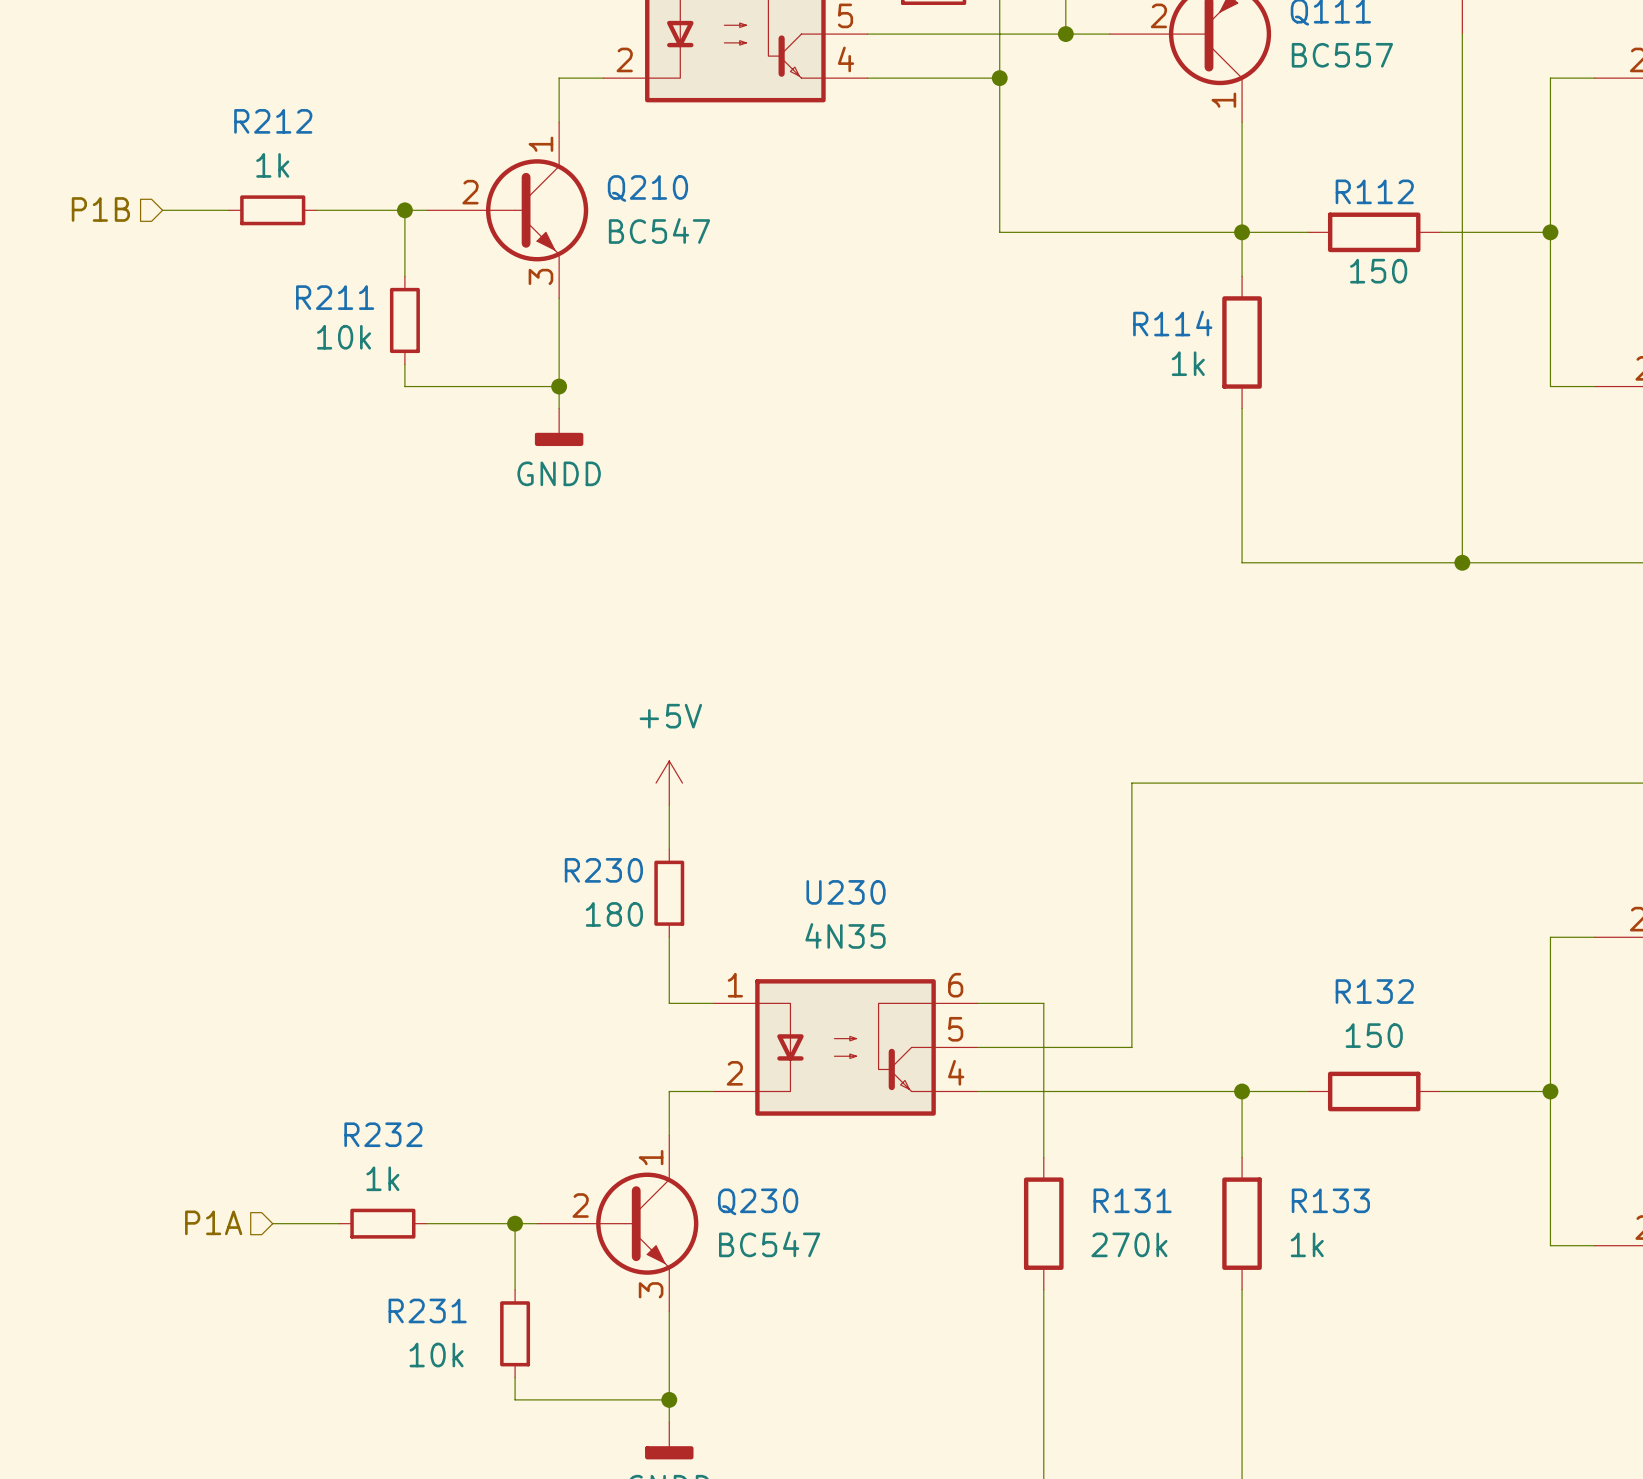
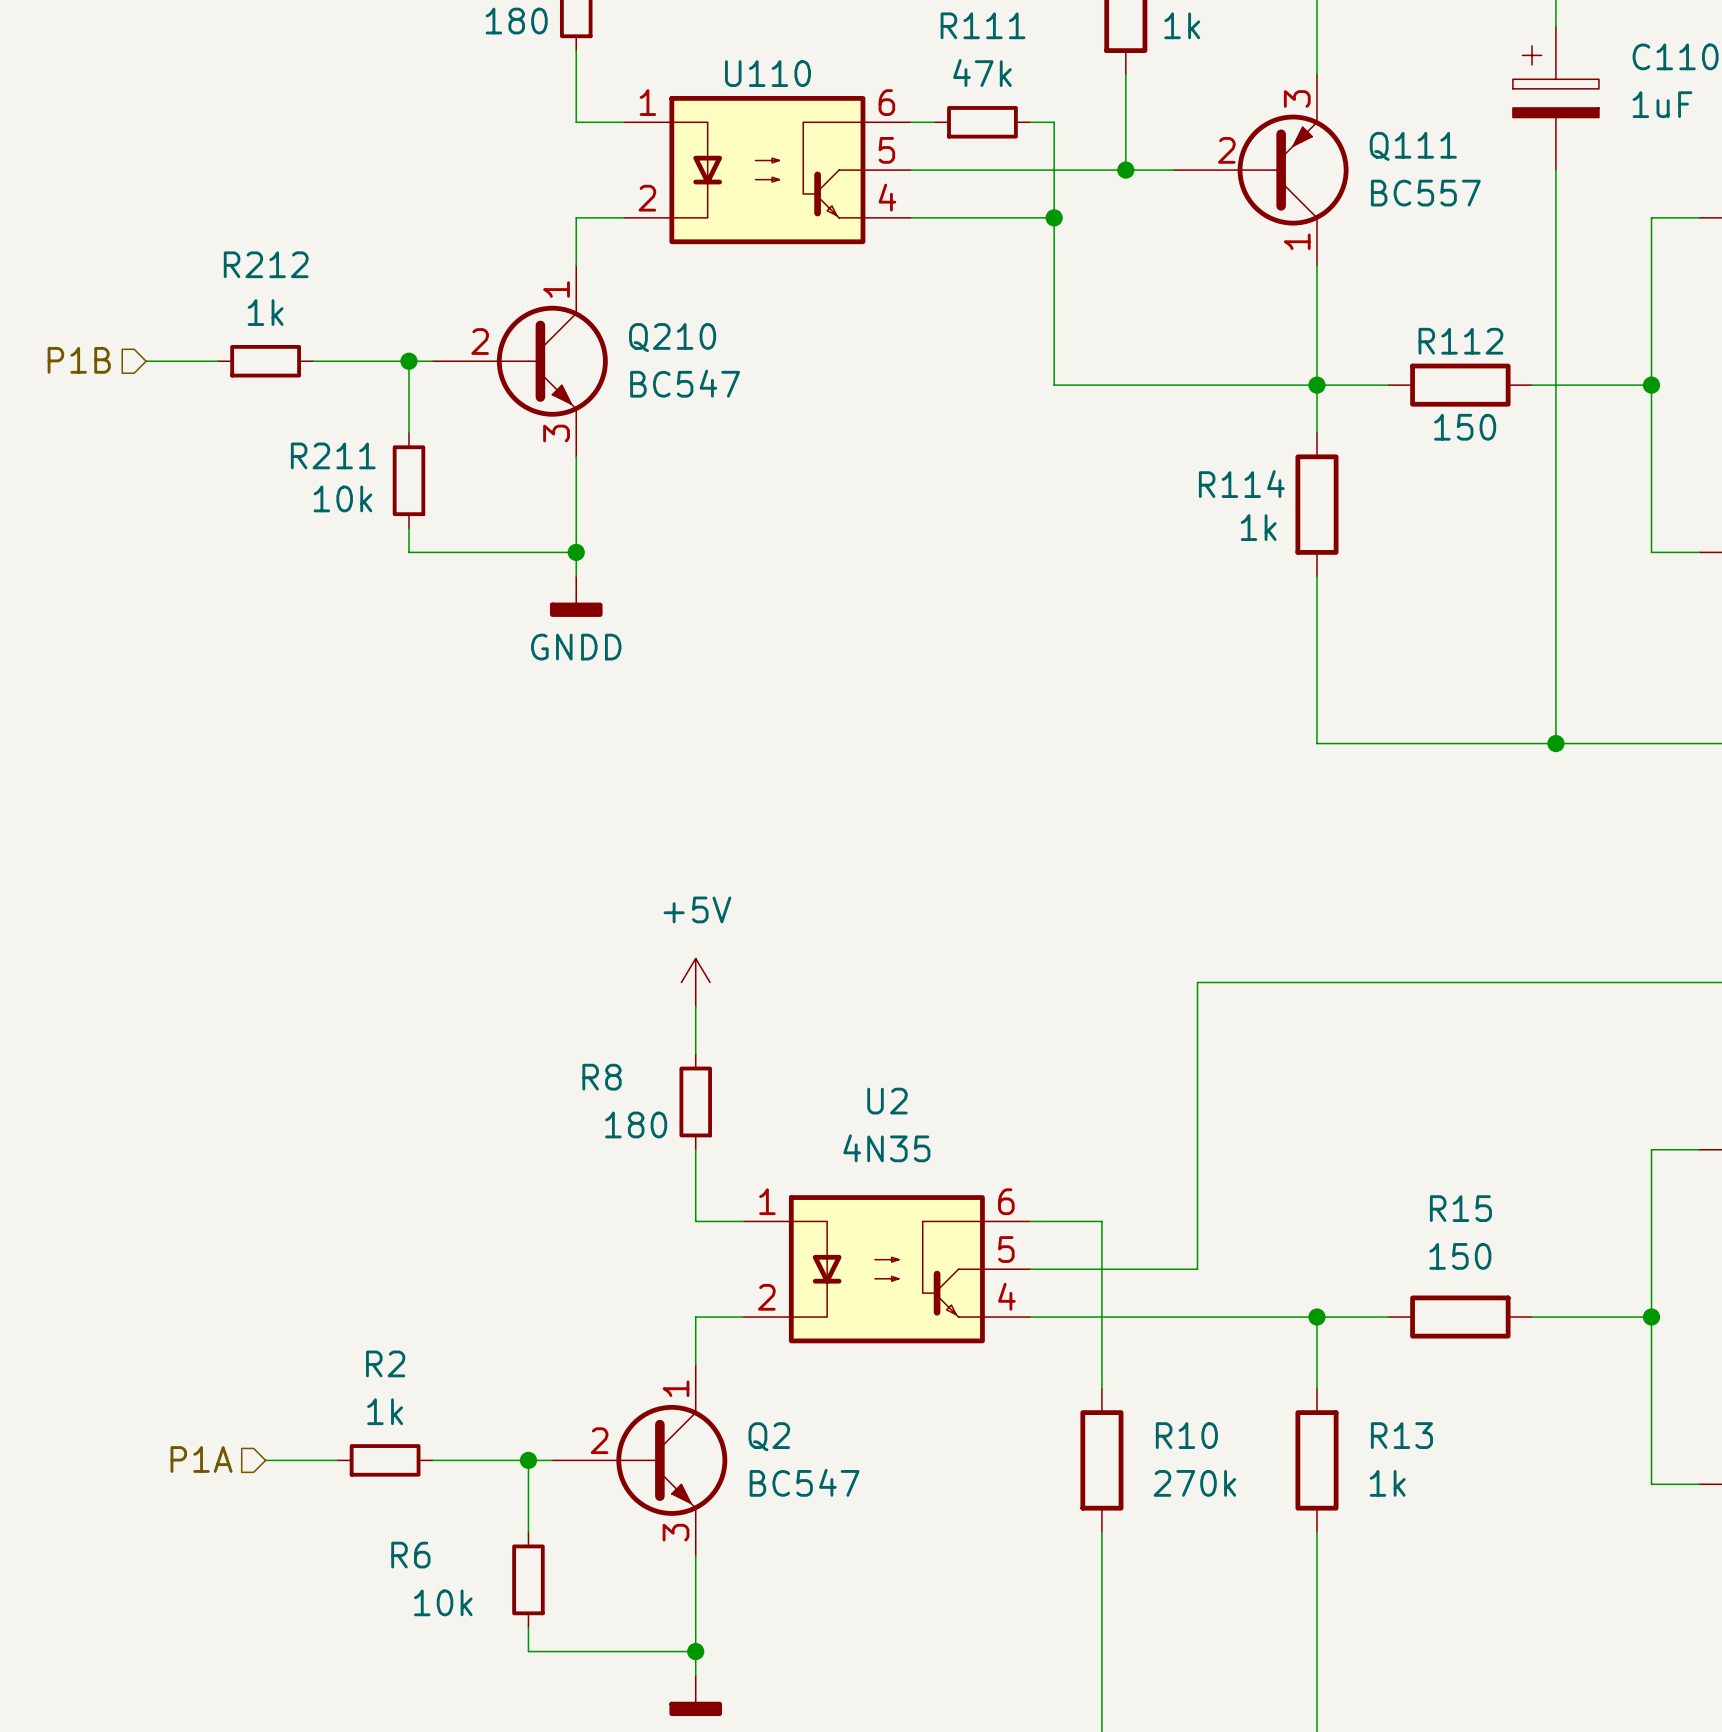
R230 name: R230 (603, 870) -> R8 (602, 1077)
U230 name: U230 (846, 892) -> U2 (887, 1101)
R132 name: R132 (1374, 991) -> R15 (1460, 1208)
R232 name: R232 (383, 1134) -> R2 (385, 1363)
R131 name: R131 (1132, 1200) -> R10 (1186, 1435)
R133 name: R133 (1330, 1200) -> R13 (1401, 1435)
Q230 name: Q230 (758, 1201) -> Q2 (769, 1436)
R231 name: R231 (427, 1310) -> R6 (410, 1555)

